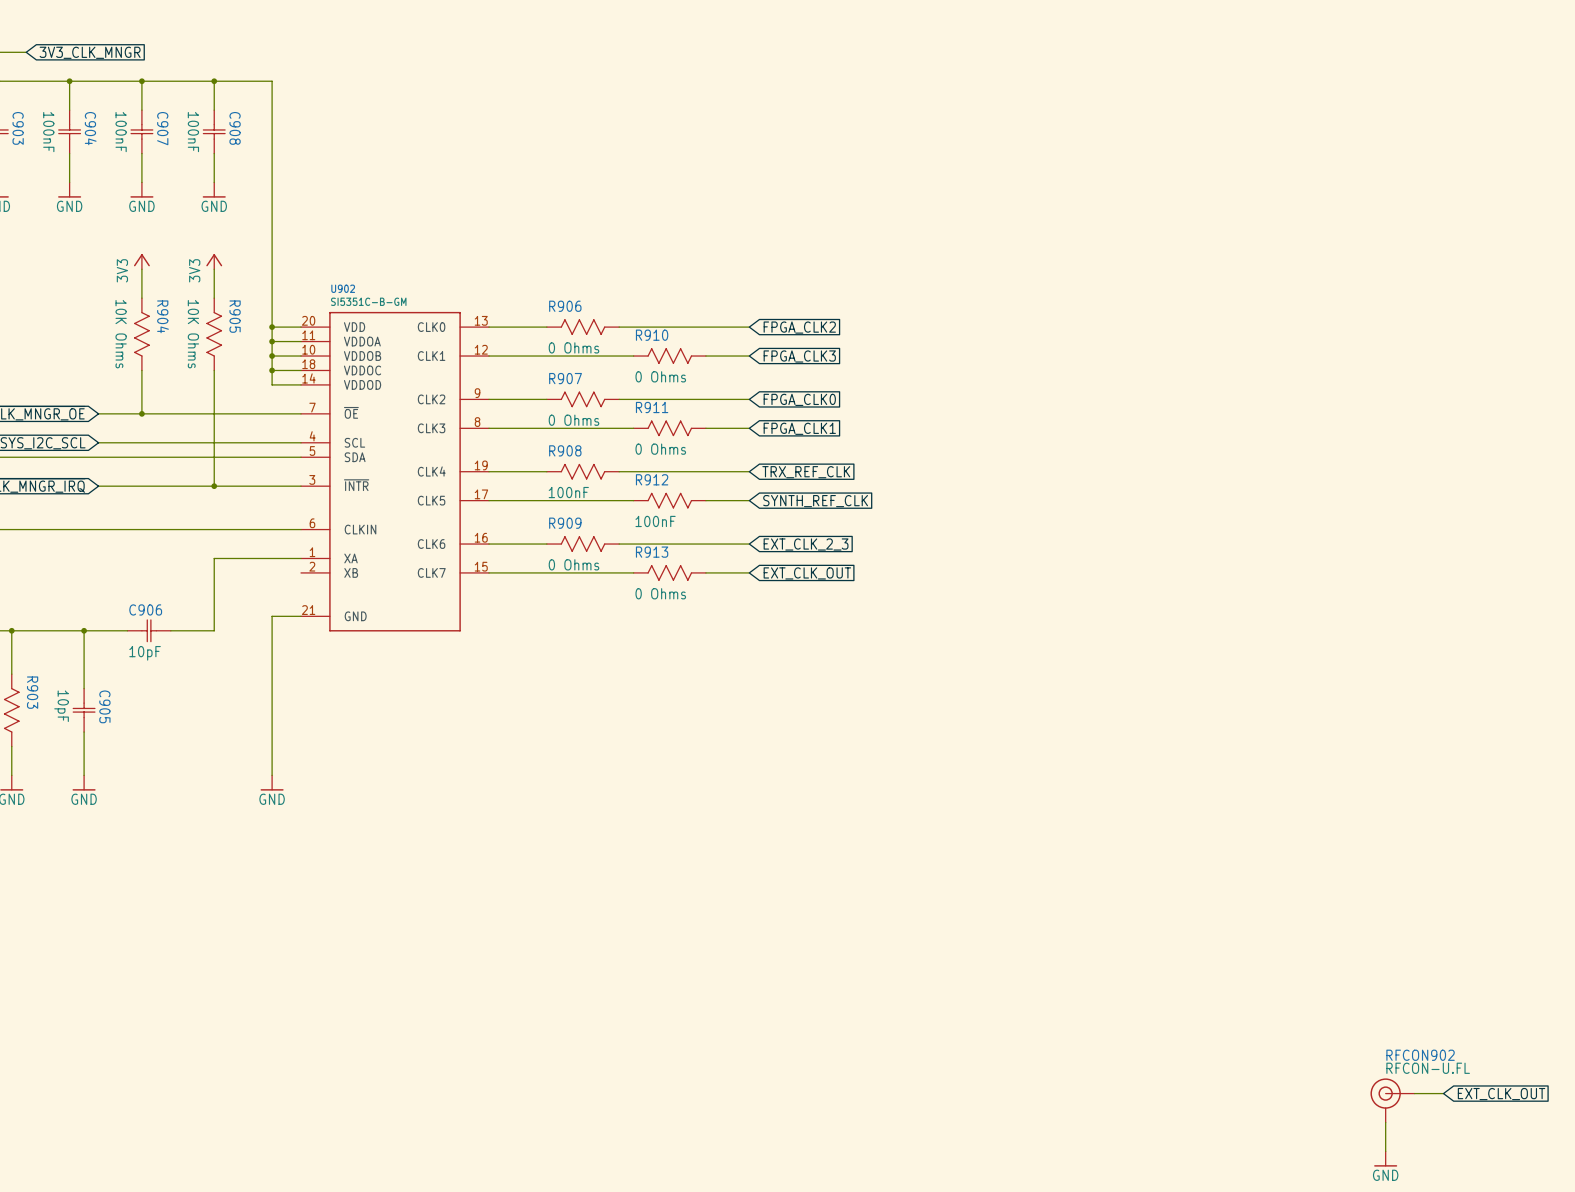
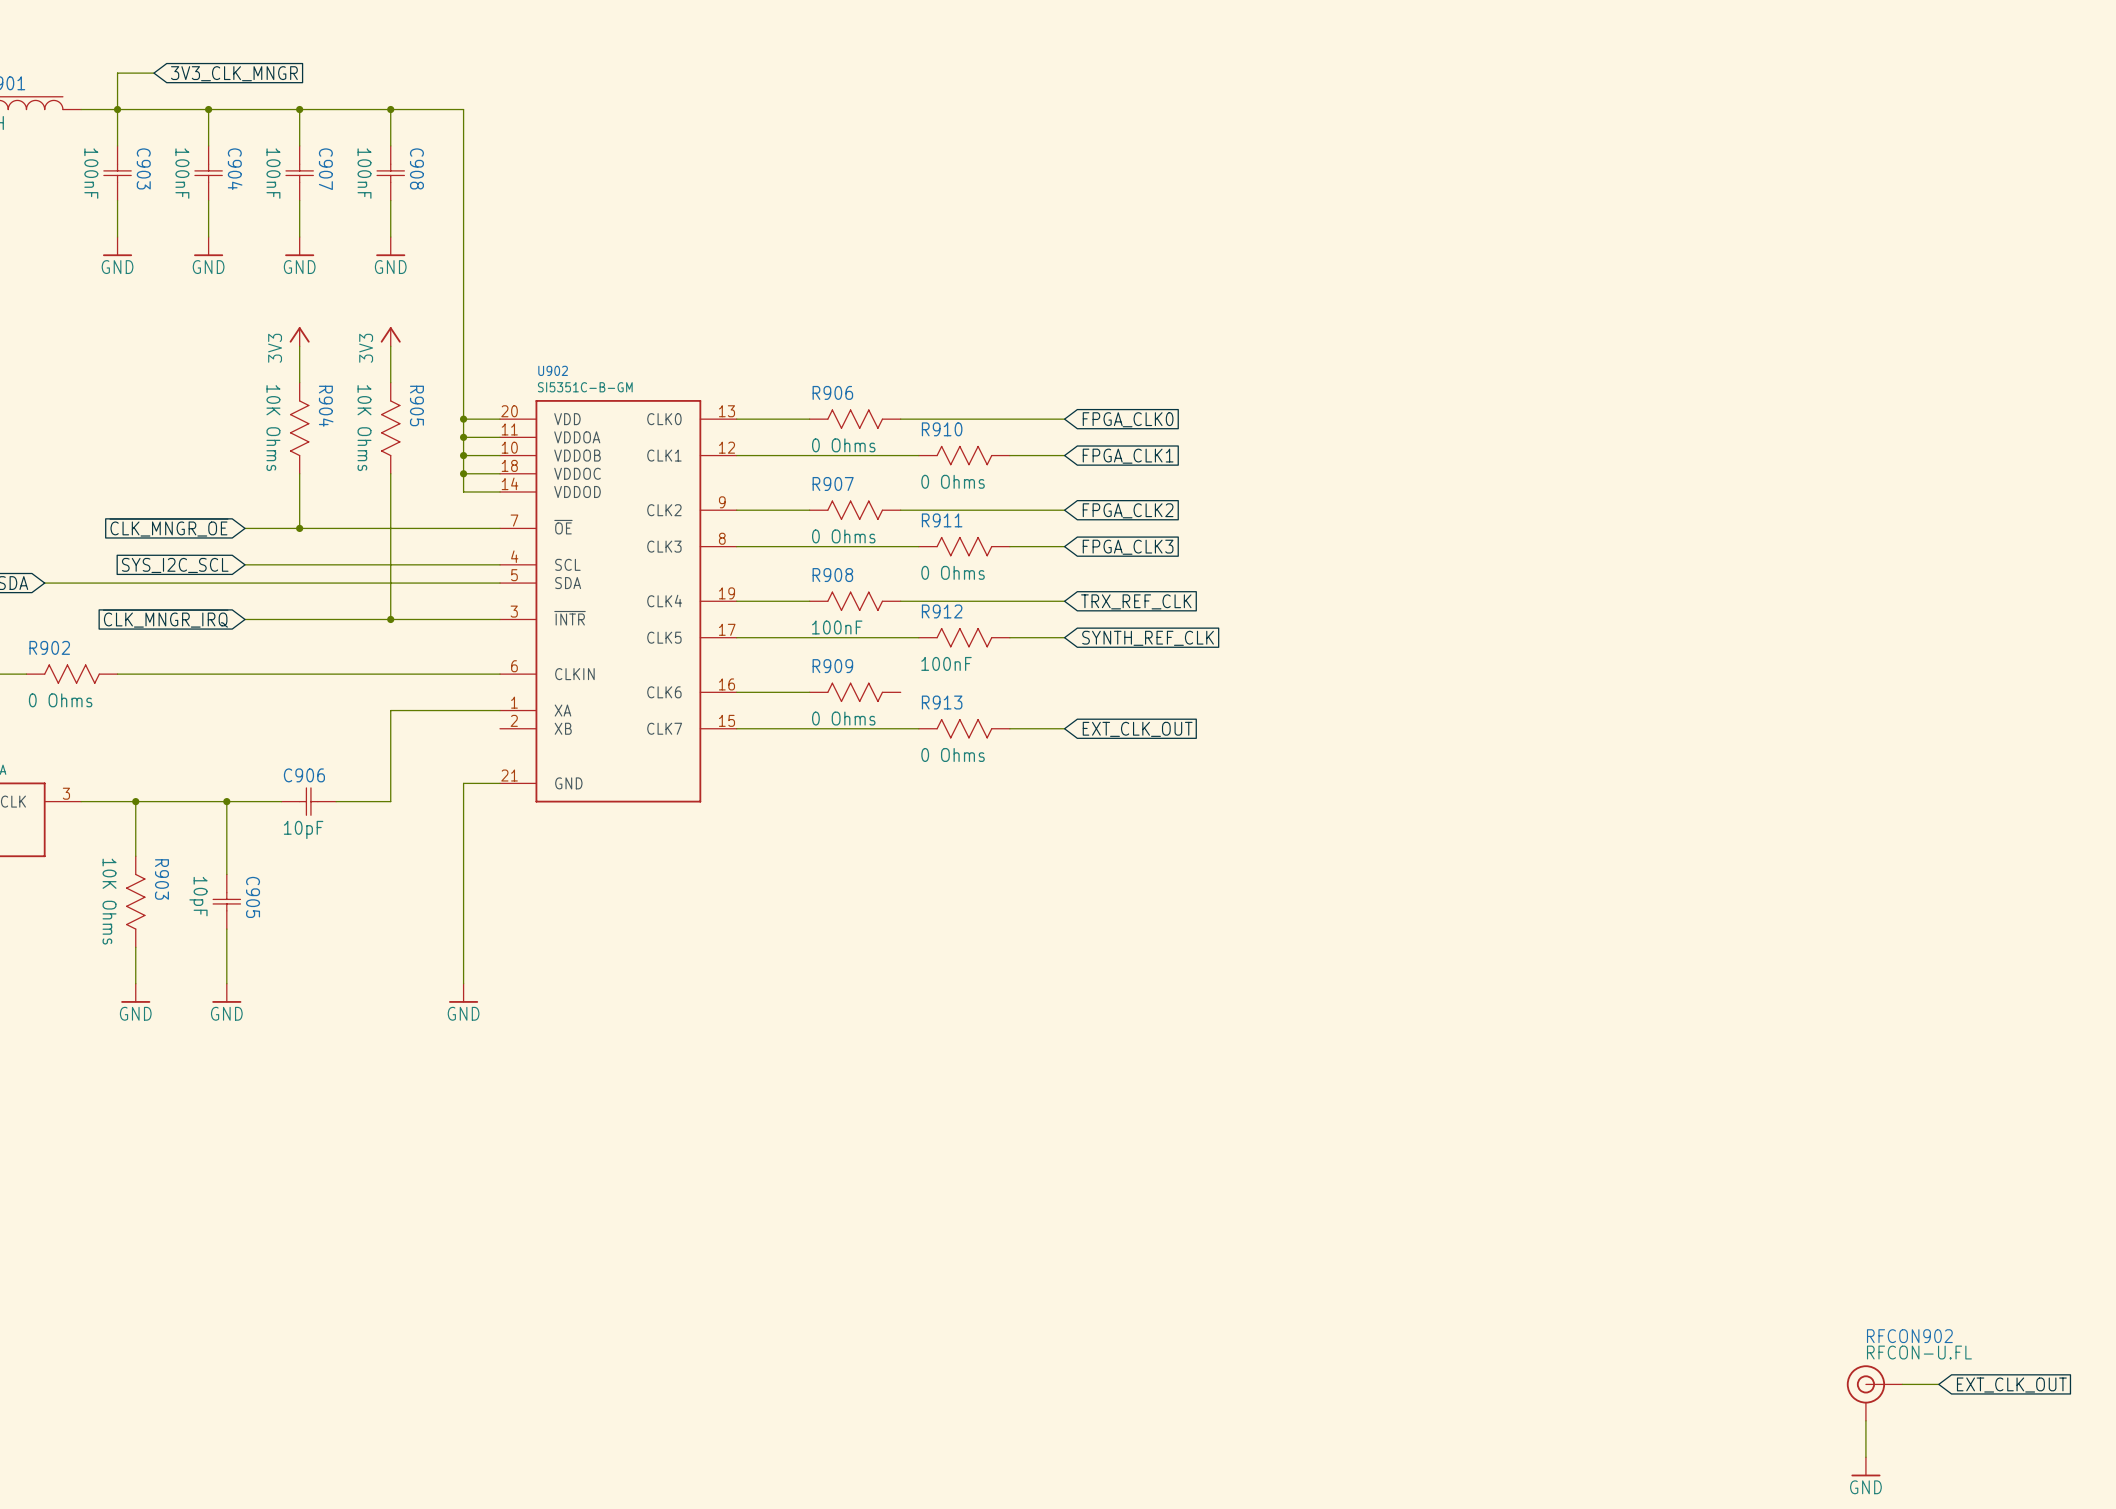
global label: FPGA_CLK2 (799, 327) -> FPGA_CLK0 (1128, 419)
global label: FPGA_CLK3 (799, 356) -> FPGA_CLK1 (1128, 456)
global label: FPGA_CLK0 (799, 399) -> FPGA_CLK2 (1128, 510)
global label: FPGA_CLK1 (799, 428) -> FPGA_CLK3 (1128, 547)
wire: (619, 544) (749, 544) -> none
global label: EXT_CLK_2_3 (806, 544) -> none

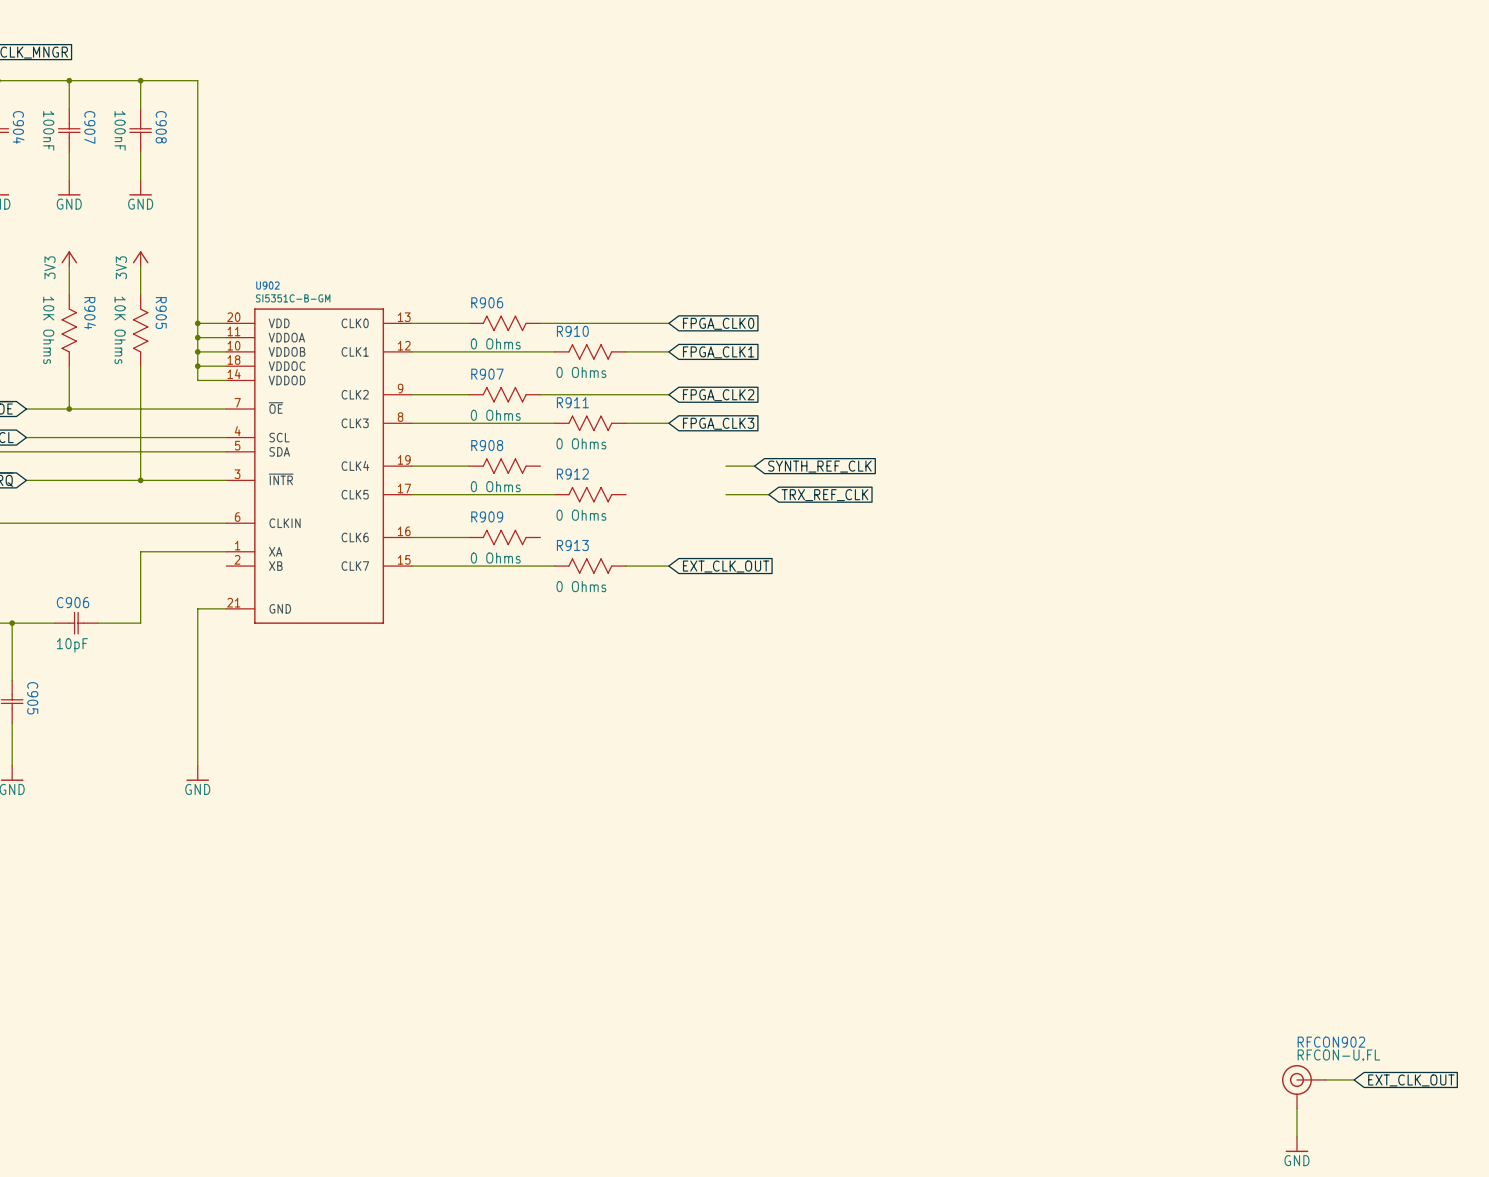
wire: (900, 601) (1064, 601) -> none
global label position: TRX_REF_CLK (1136, 601) -> TRX_REF_CLK (824, 495)
wire: none -> (725, 466) (754, 466)
R908 value: 100nF (837, 627) -> 0 Ohms (495, 486)
wire: (1009, 637) (1064, 637) -> (725, 494) (768, 494)
global label position: SYNTH_REF_CLK (1148, 638) -> SYNTH_REF_CLK (819, 466)
R912 value: 100nF (946, 663) -> 0 Ohms (581, 515)

